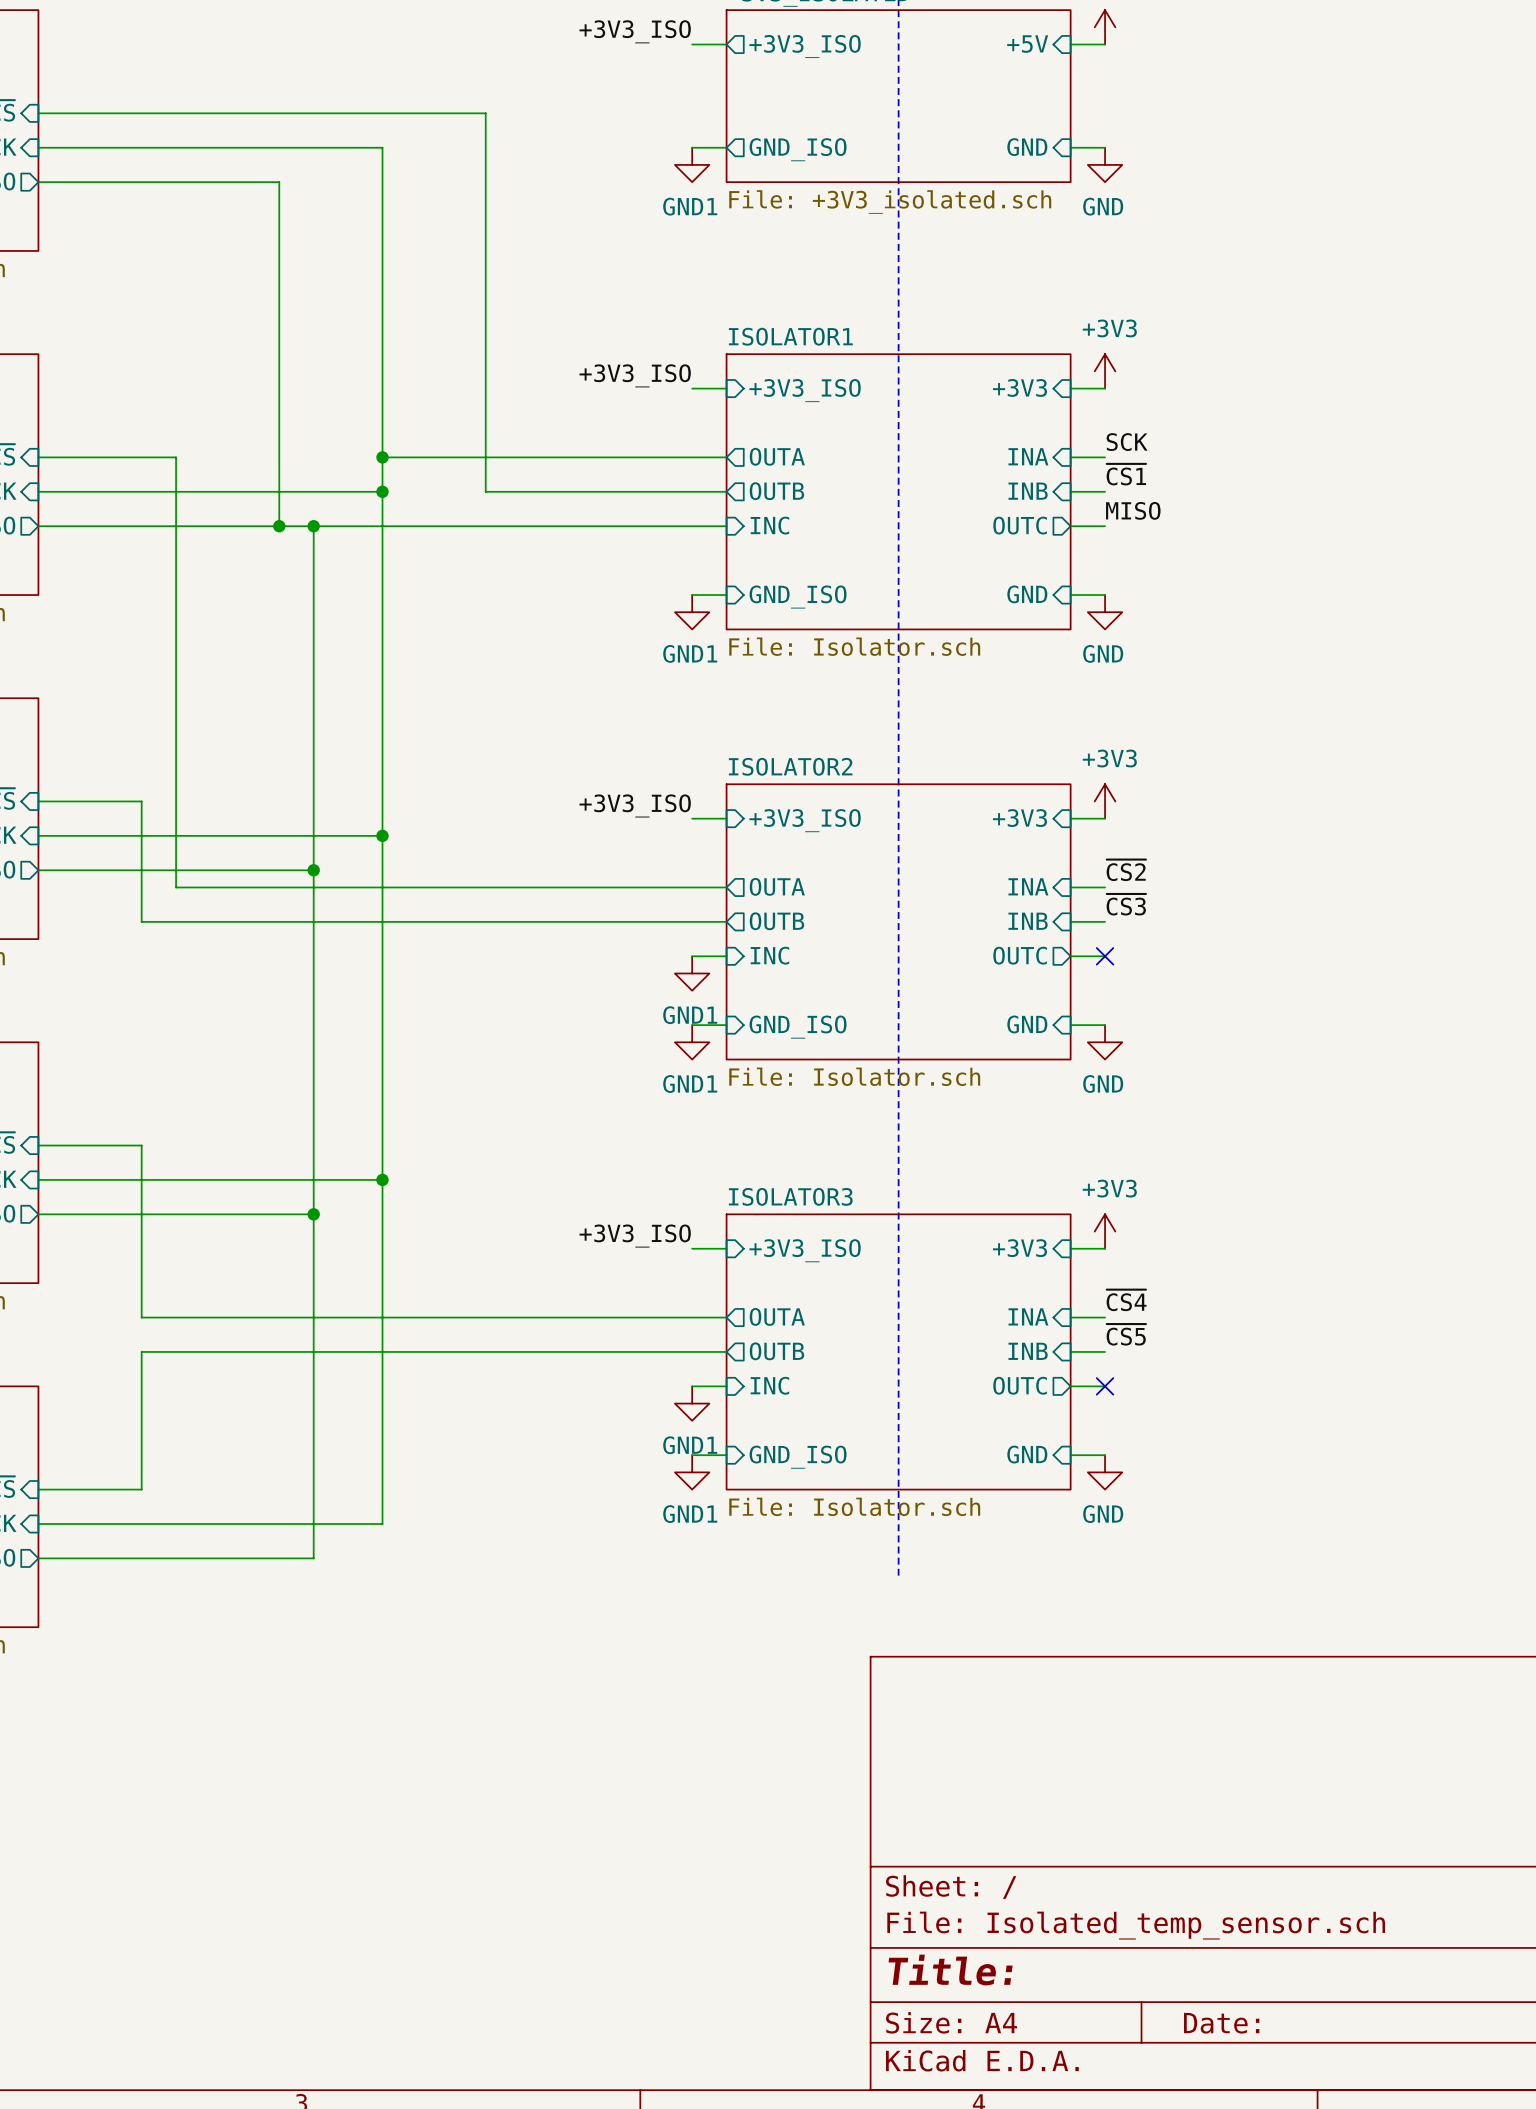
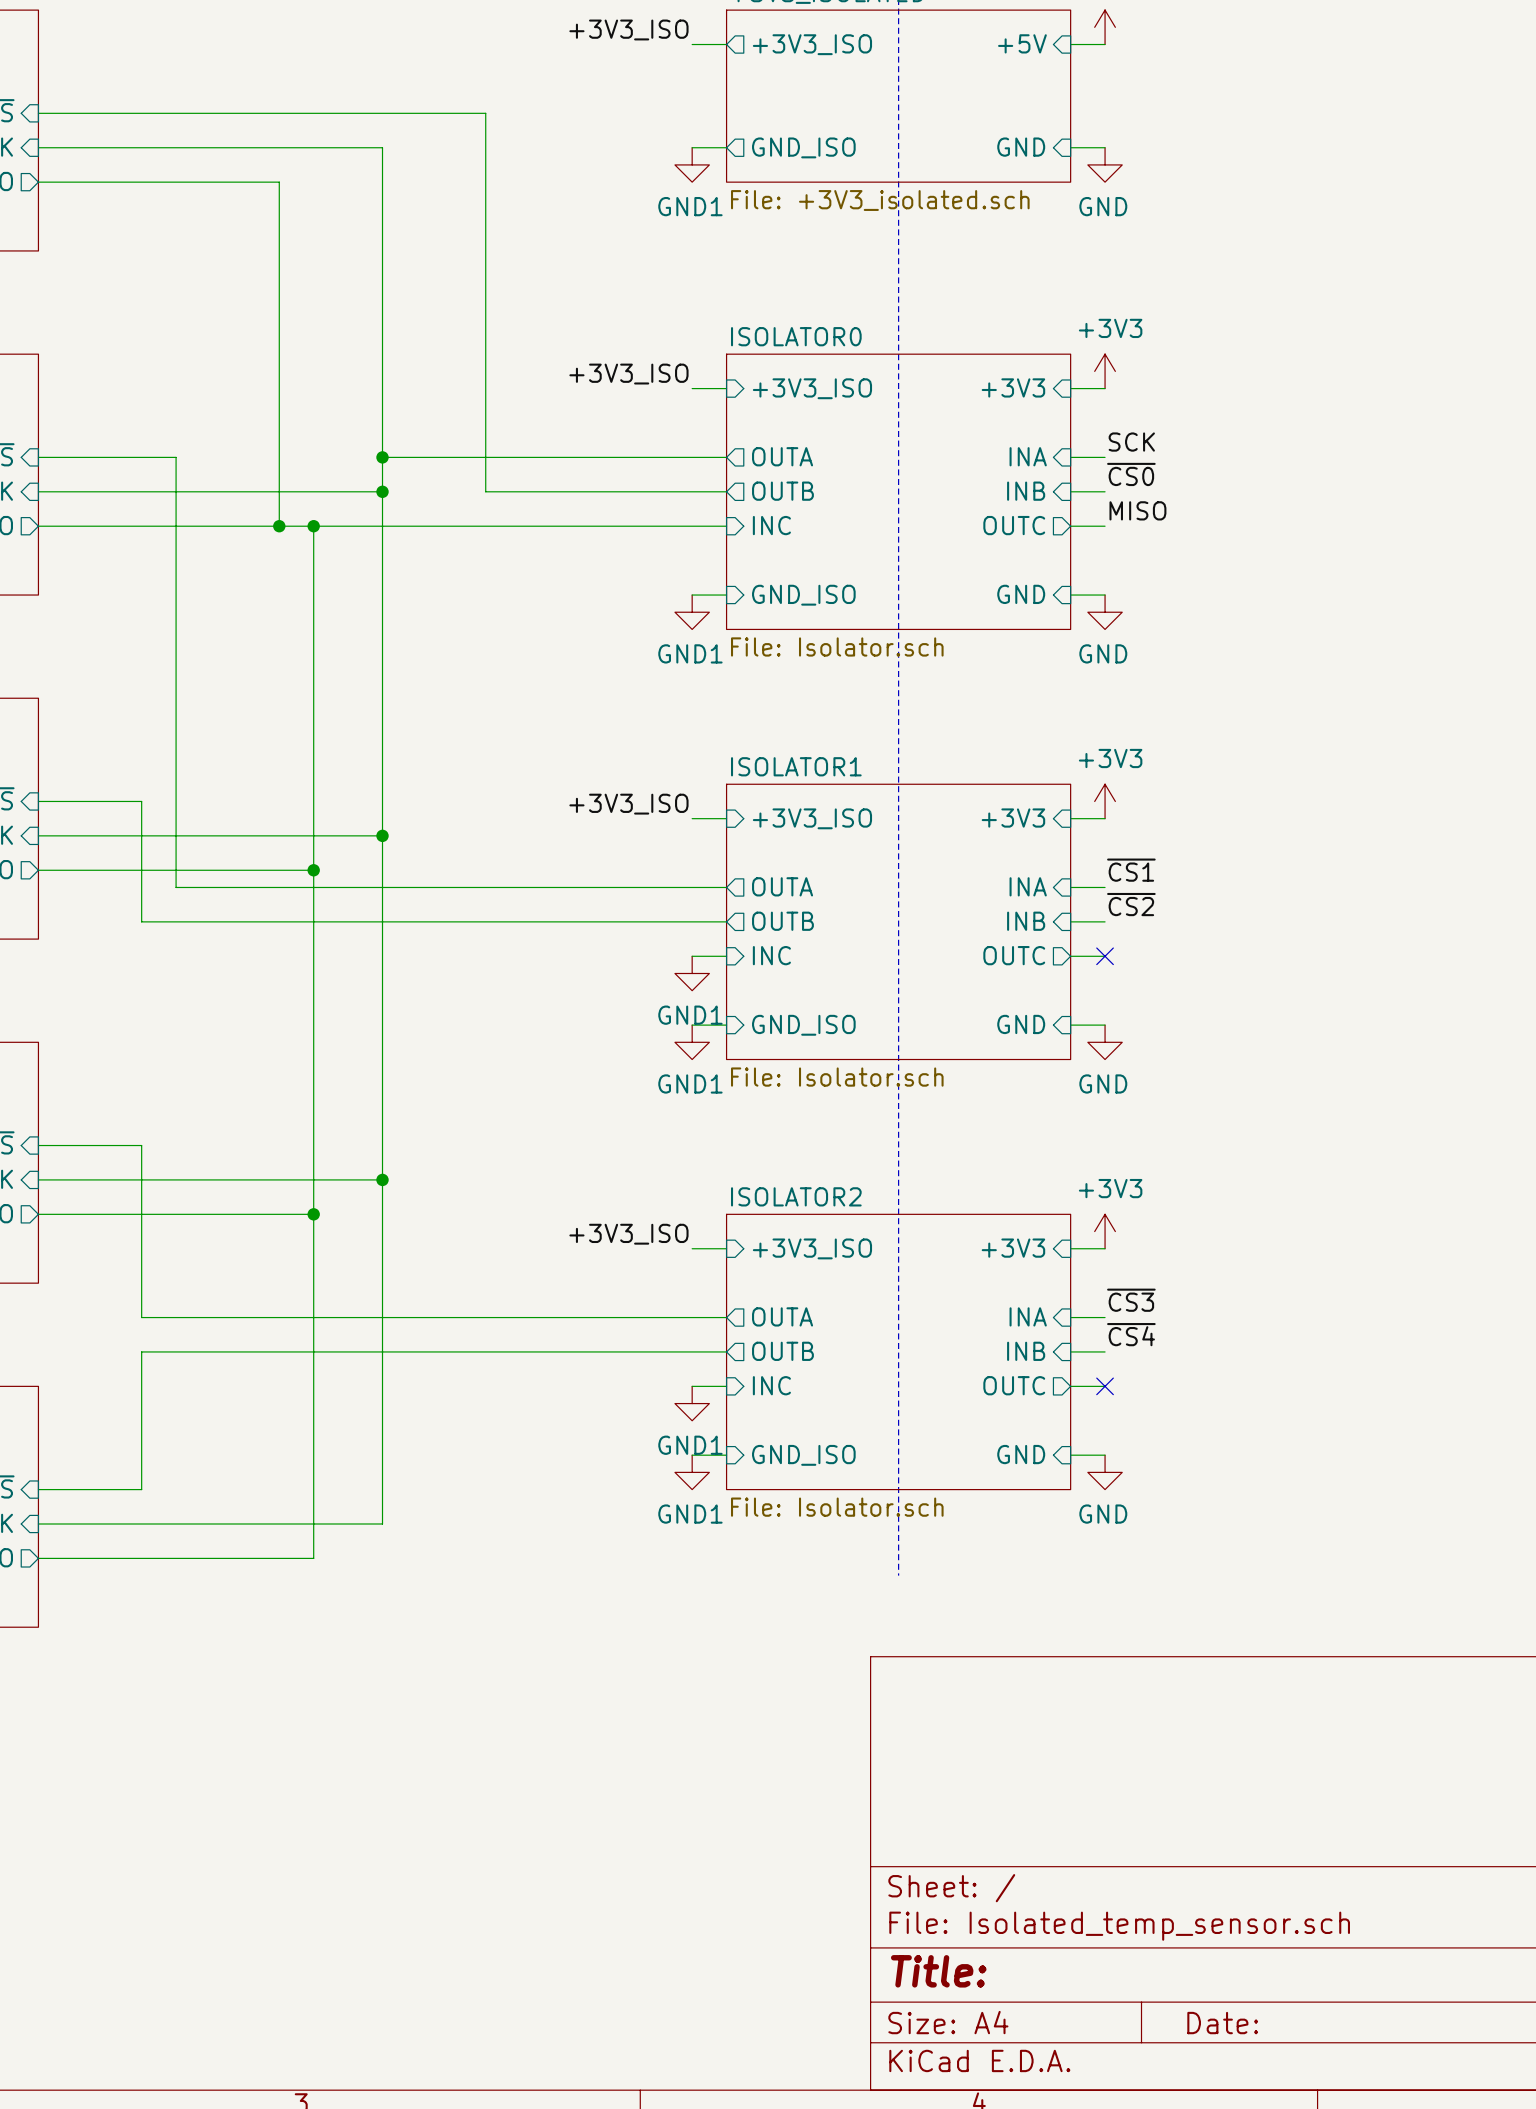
sheet ISOLATOR1 name: ISOLATOR1 (790, 336) -> ISOLATOR0 (796, 336)
label: ~{CS1} (1126, 474) -> ~{CS0} (1131, 474)
sheet ISOLATOR2 name: ISOLATOR2 (790, 766) -> ISOLATOR1 (796, 766)
label: ~{CS2} (1126, 870) -> ~{CS1} (1131, 870)
label: ~{CS3} (1126, 904) -> ~{CS2} (1131, 904)
sheet ISOLATOR3 name: ISOLATOR3 (790, 1196) -> ISOLATOR2 (796, 1196)
label: ~{CS4} (1126, 1300) -> ~{CS3} (1131, 1300)
label: ~{CS5} (1126, 1334) -> ~{CS4} (1131, 1334)

